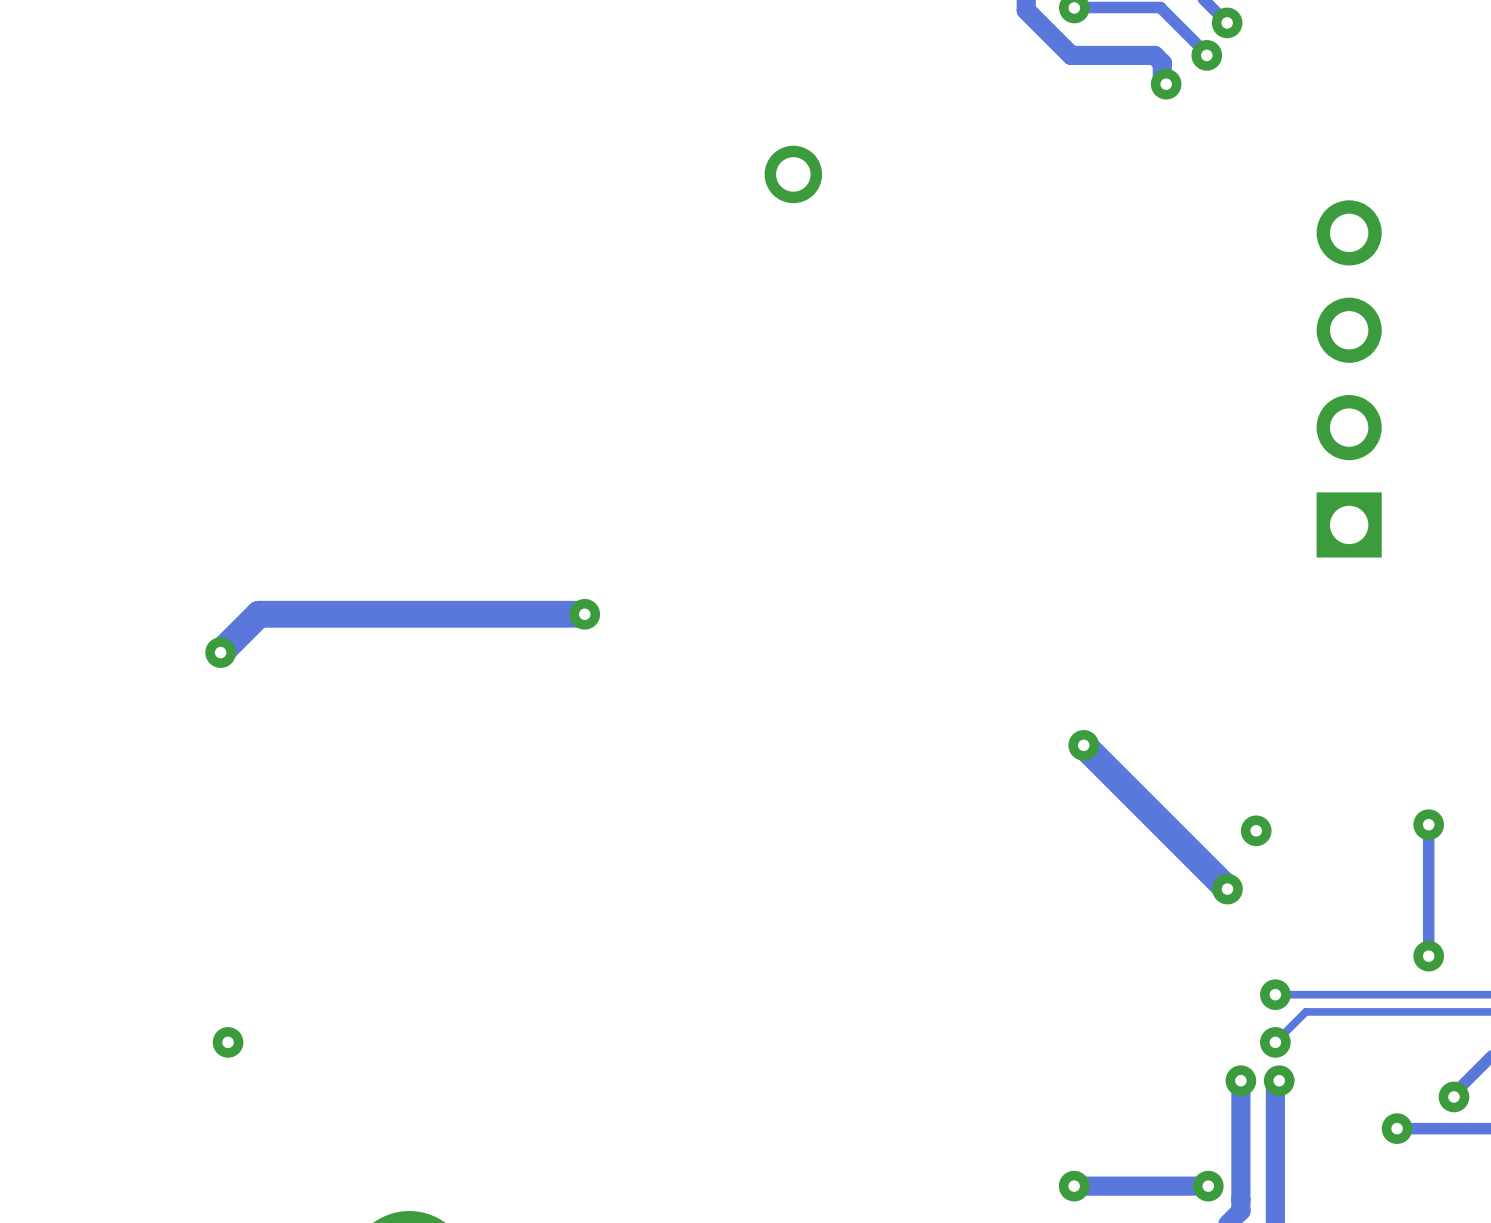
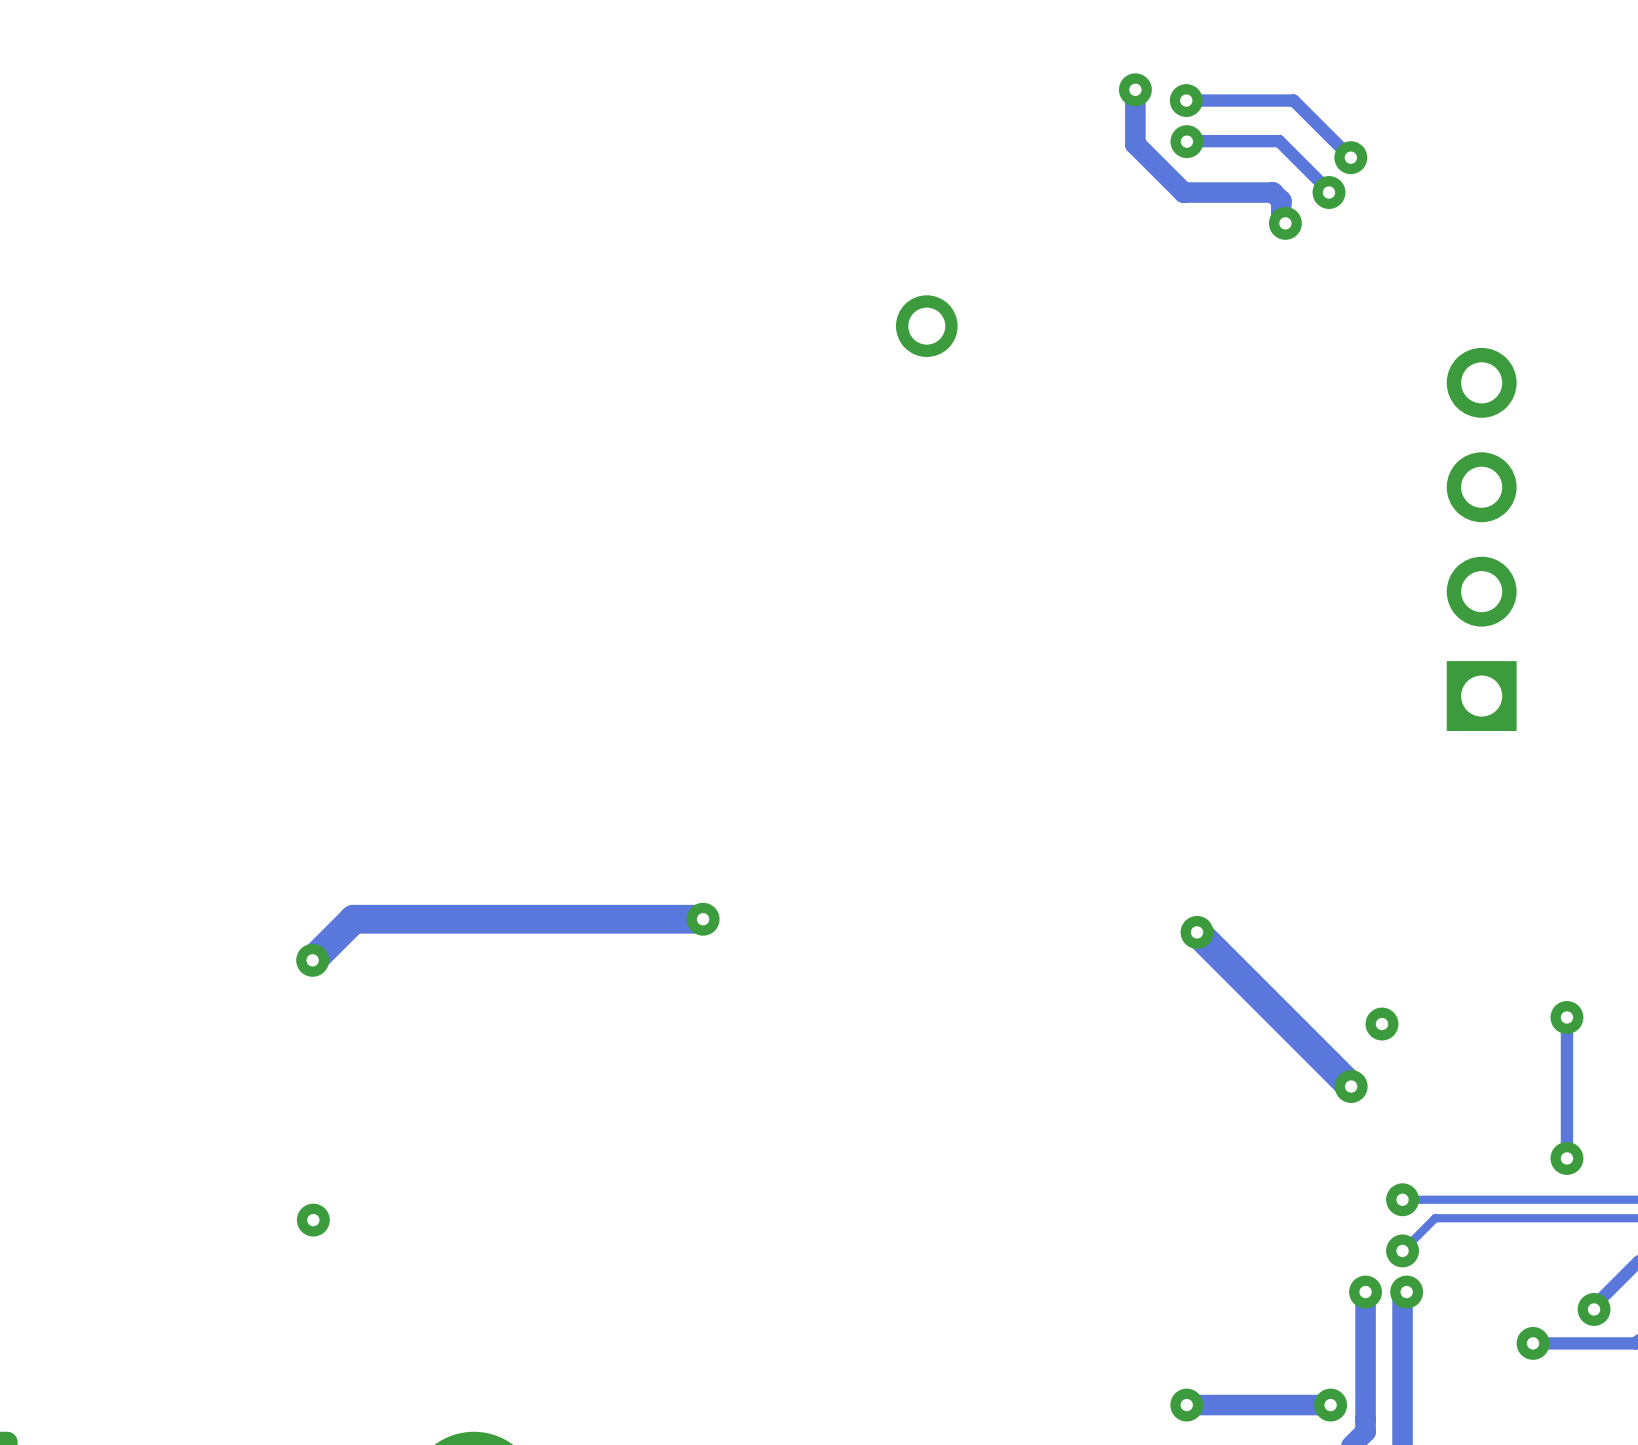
via position: (793, 174) -> (926, 326)
track: (584, 614) (258, 614) (220, 652) -> (703, 919) (353, 919) (312, 960)
via position: (584, 614) -> (703, 919)
via position: (220, 652) -> (312, 960)
via position: (228, 1042) -> (313, 1220)

